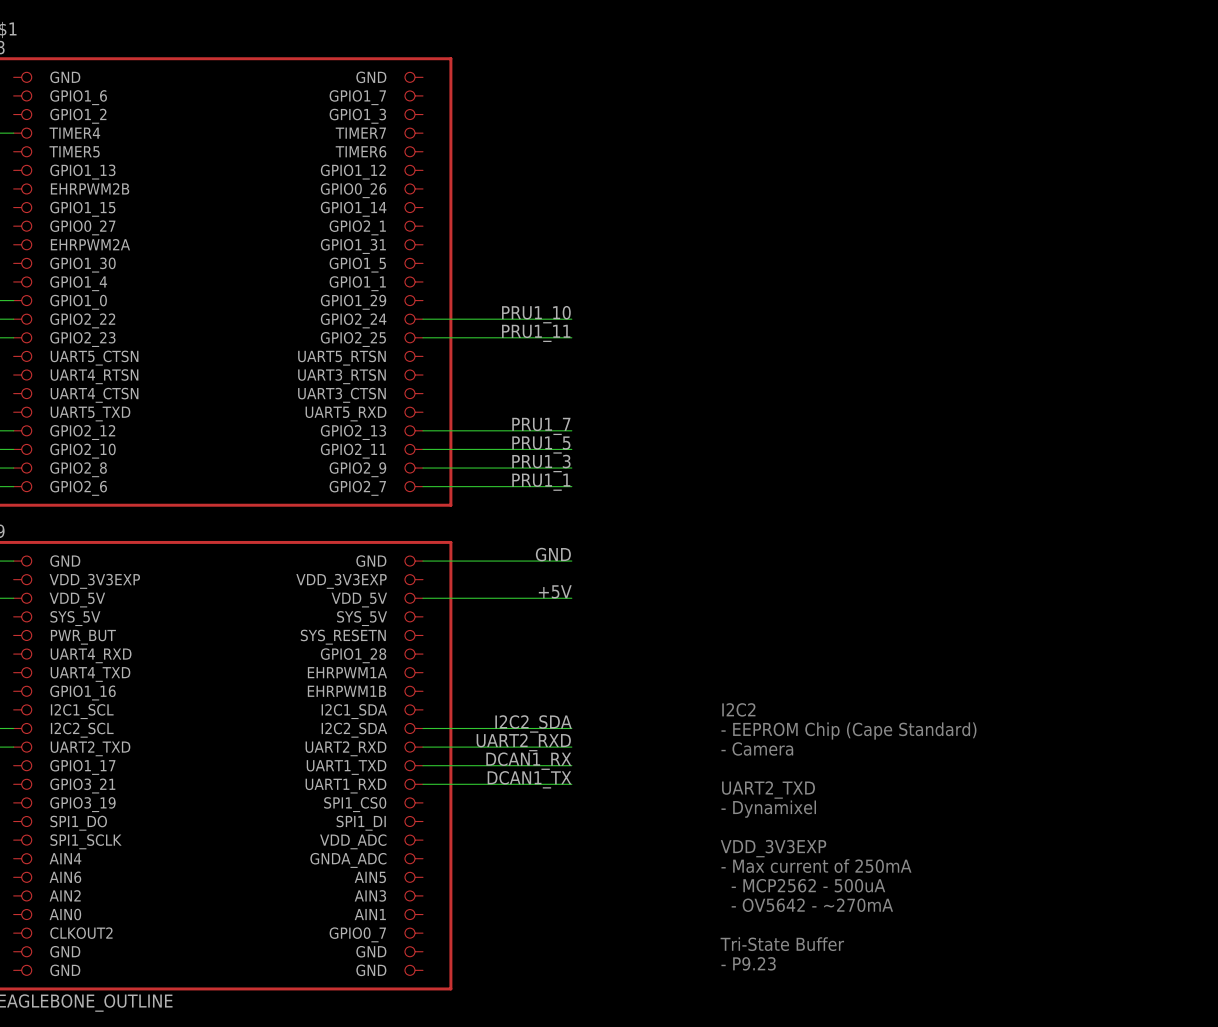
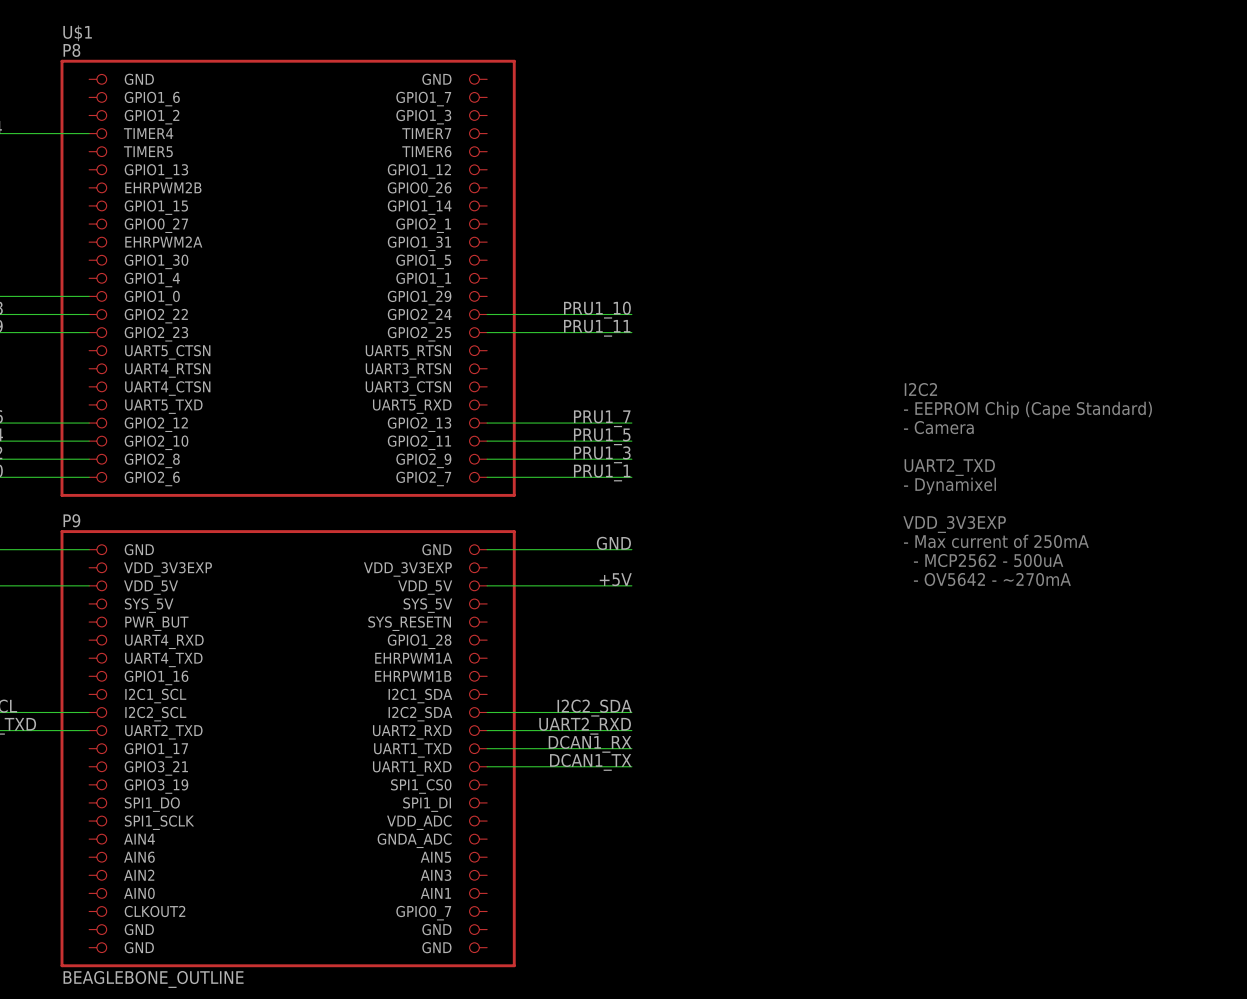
text: none -> I2C2 (920, 389)
text: none -> - EEPROM Chip (Cape Standard) (1027, 410)
text: none -> - Camera (938, 427)
text: none -> UART2_TXD (949, 467)
text: none -> - Dynamixel (949, 486)
text: none -> VDD_3V3EXP (954, 524)
text: none -> - Max current of 250mA (996, 541)
text: none -> - MCP2562 - 500uA (988, 560)
text: none -> - OV5642 - ~270mA (992, 579)
text: I2C2 (738, 709) -> none
text: - EEPROM Chip (Cape Standard) (848, 731) -> none
text: - Camera (757, 748) -> none
text: UART2_TXD (768, 790) -> none
text: - Dynamixel (768, 809) -> none
text: VDD_3V3EXP (773, 848) -> none
text: - Max current of 250mA (816, 866) -> none
text: - MCP2562 - 500uA (808, 885) -> none
text: - OV5642 - ~270mA (812, 905) -> none
text: Tri-State Buffer (782, 944) -> none
text: - P9.23 (748, 963) -> none

